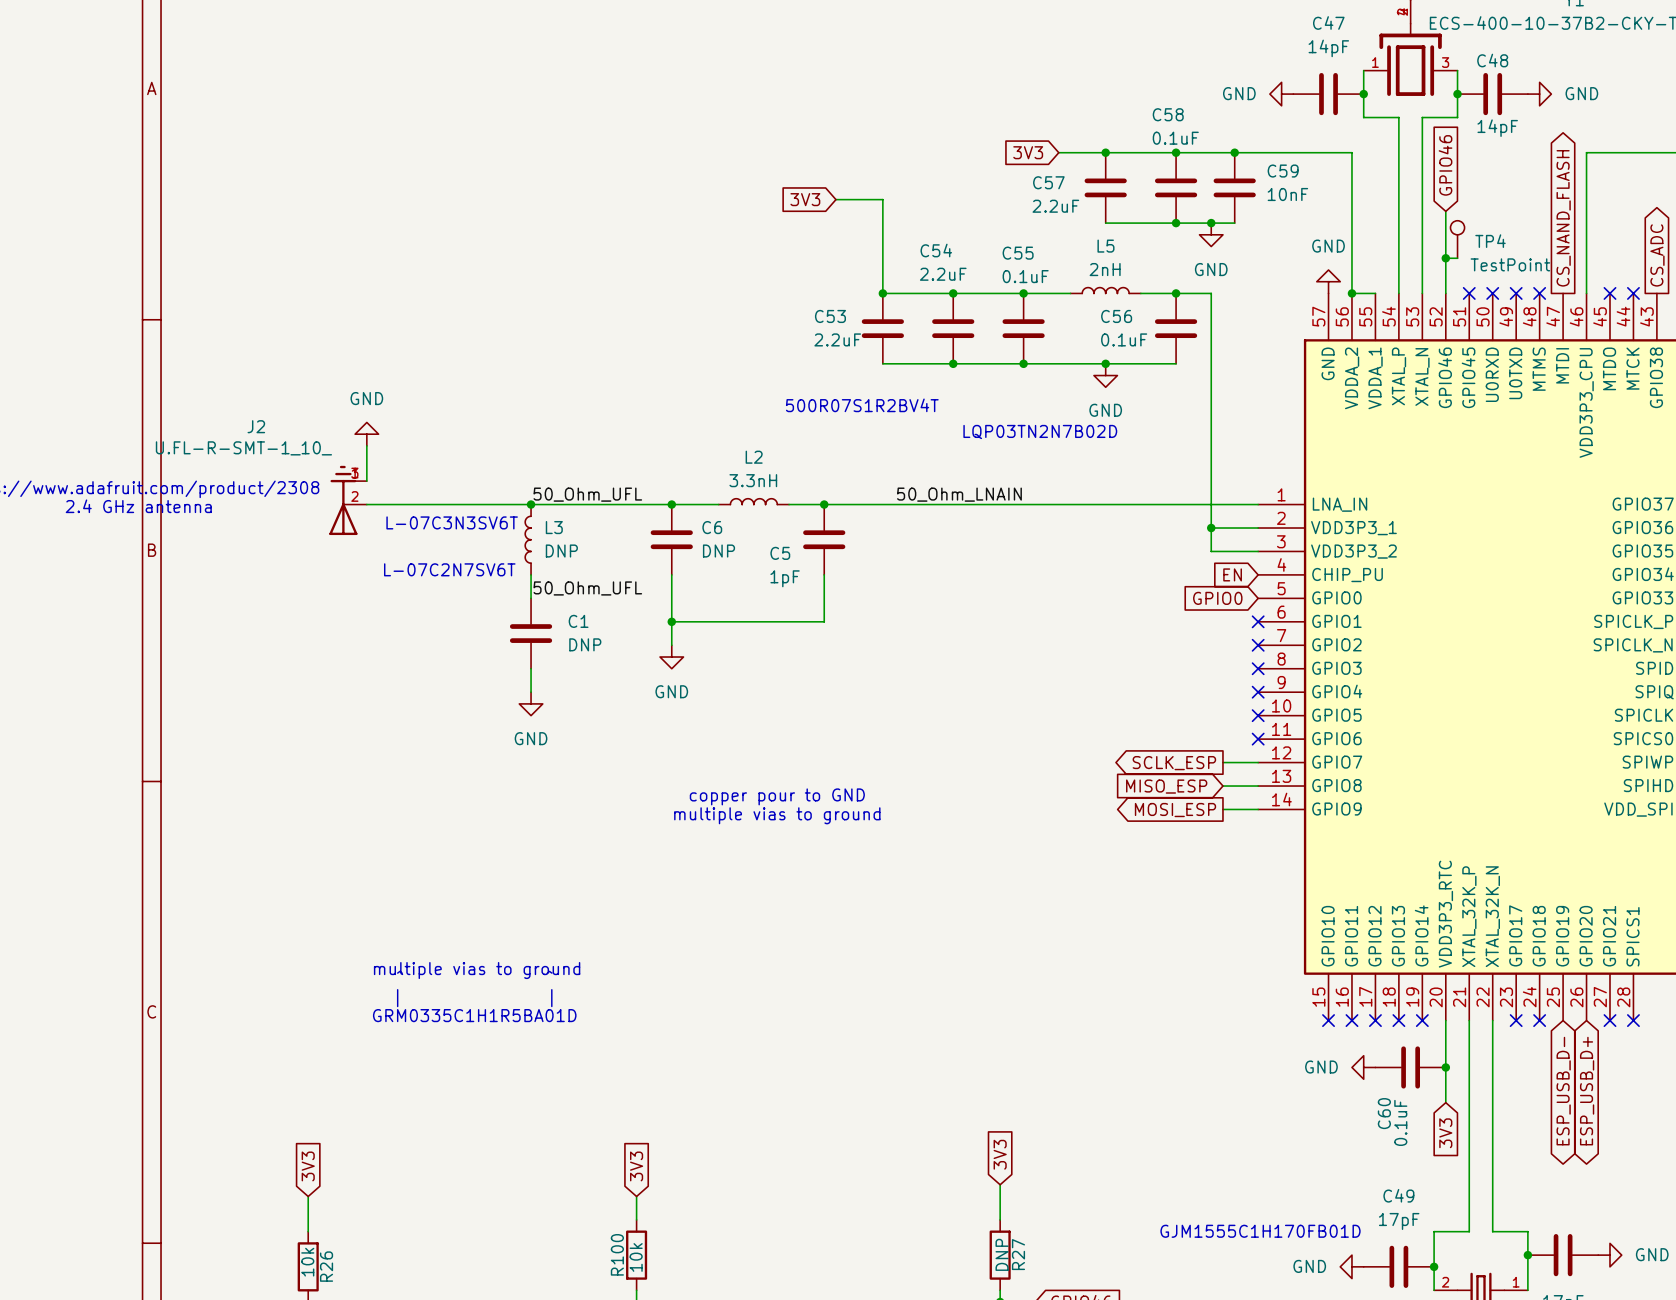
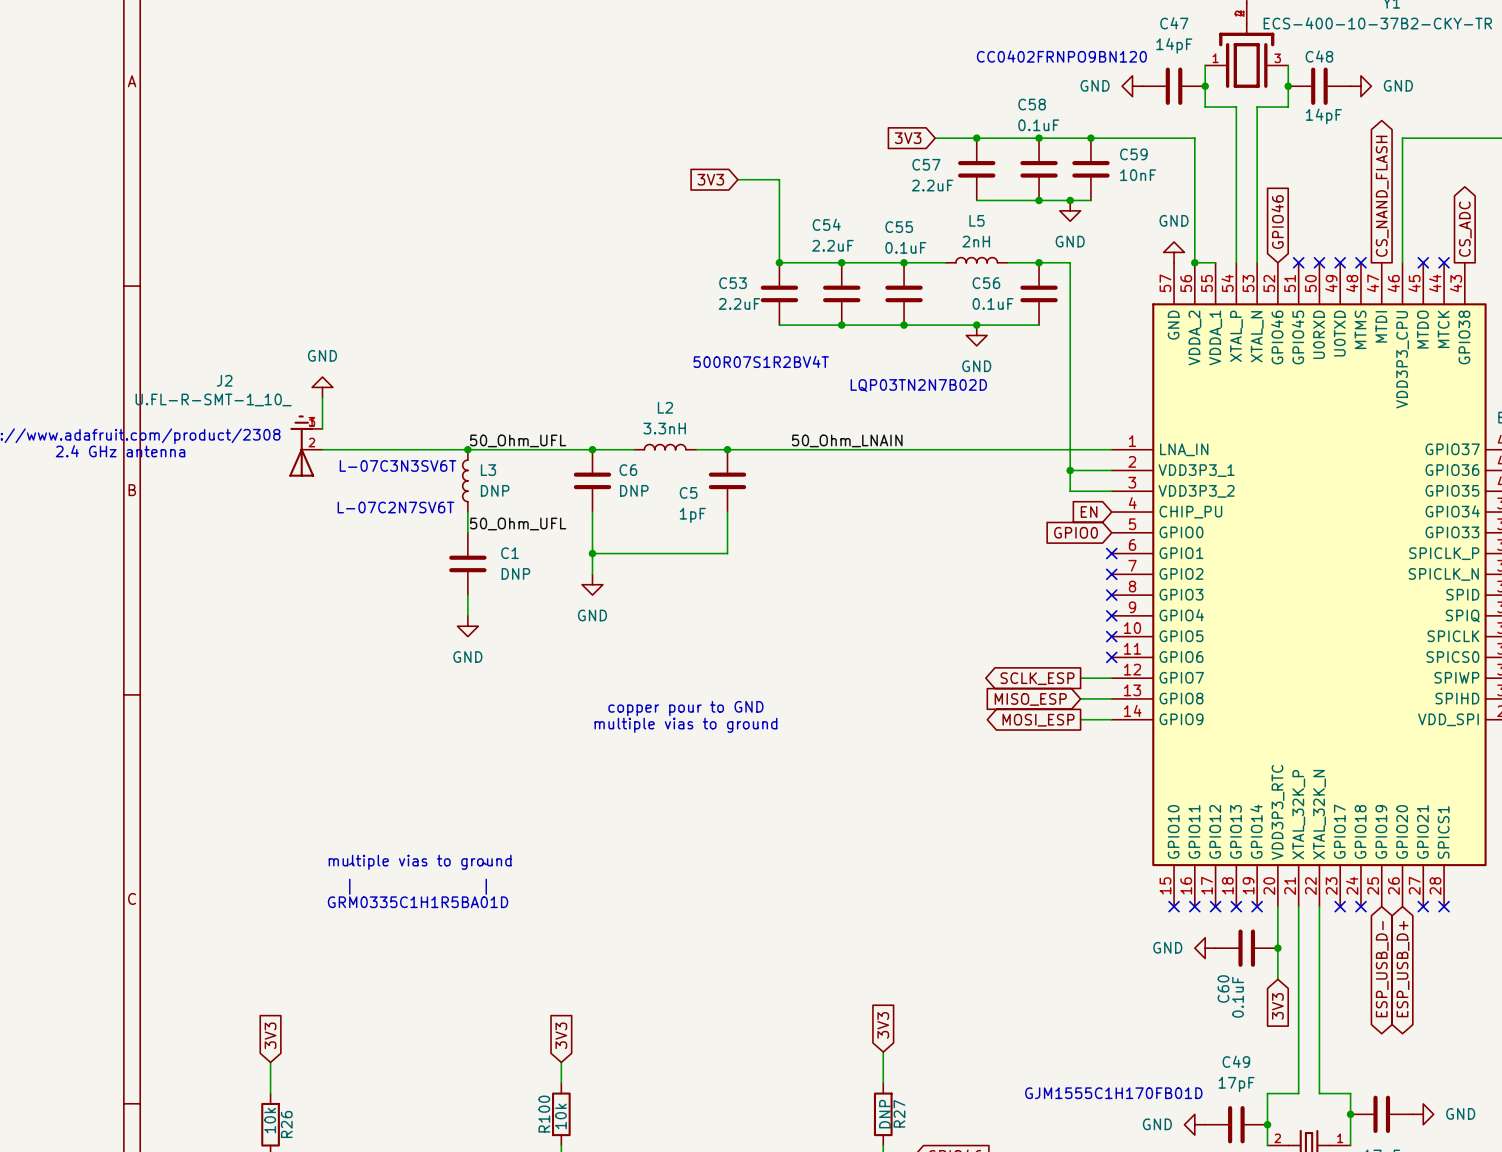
text: none -> CC0402FRNPO9BN120 (1061, 56)
global label position: GPIO46 (1445, 165) -> GPIO46 (1277, 222)
wire: (1445, 211) (1445, 293) -> none
TP4: TestPoint (1457, 239) -> none
wire: (1445, 258) (1457, 258) -> none
junction: (1445, 258) -> none

